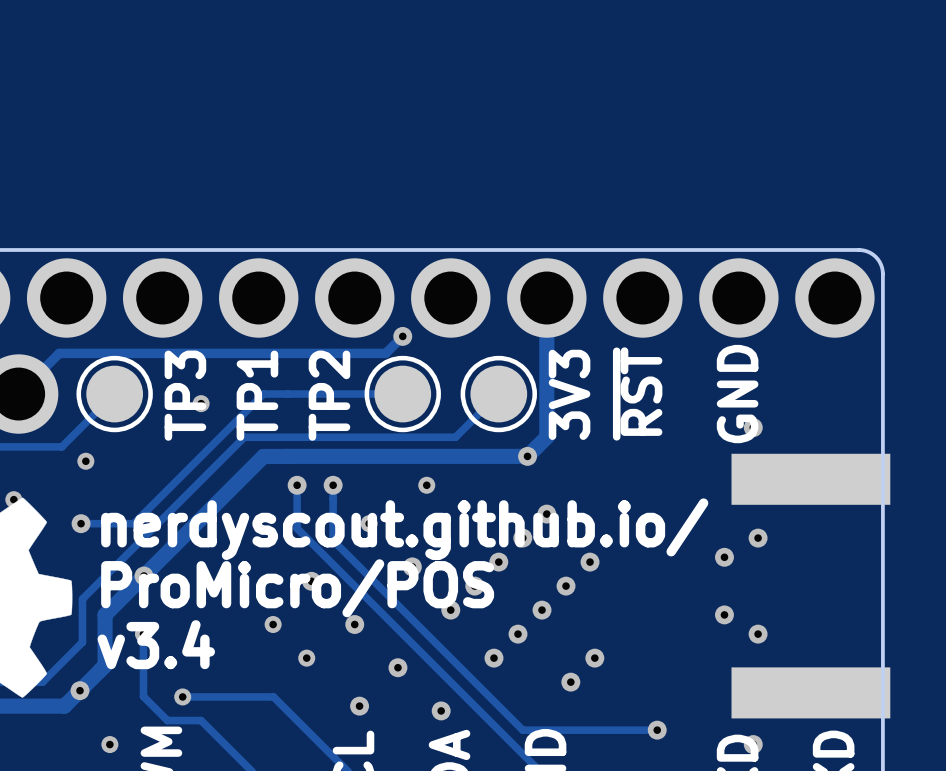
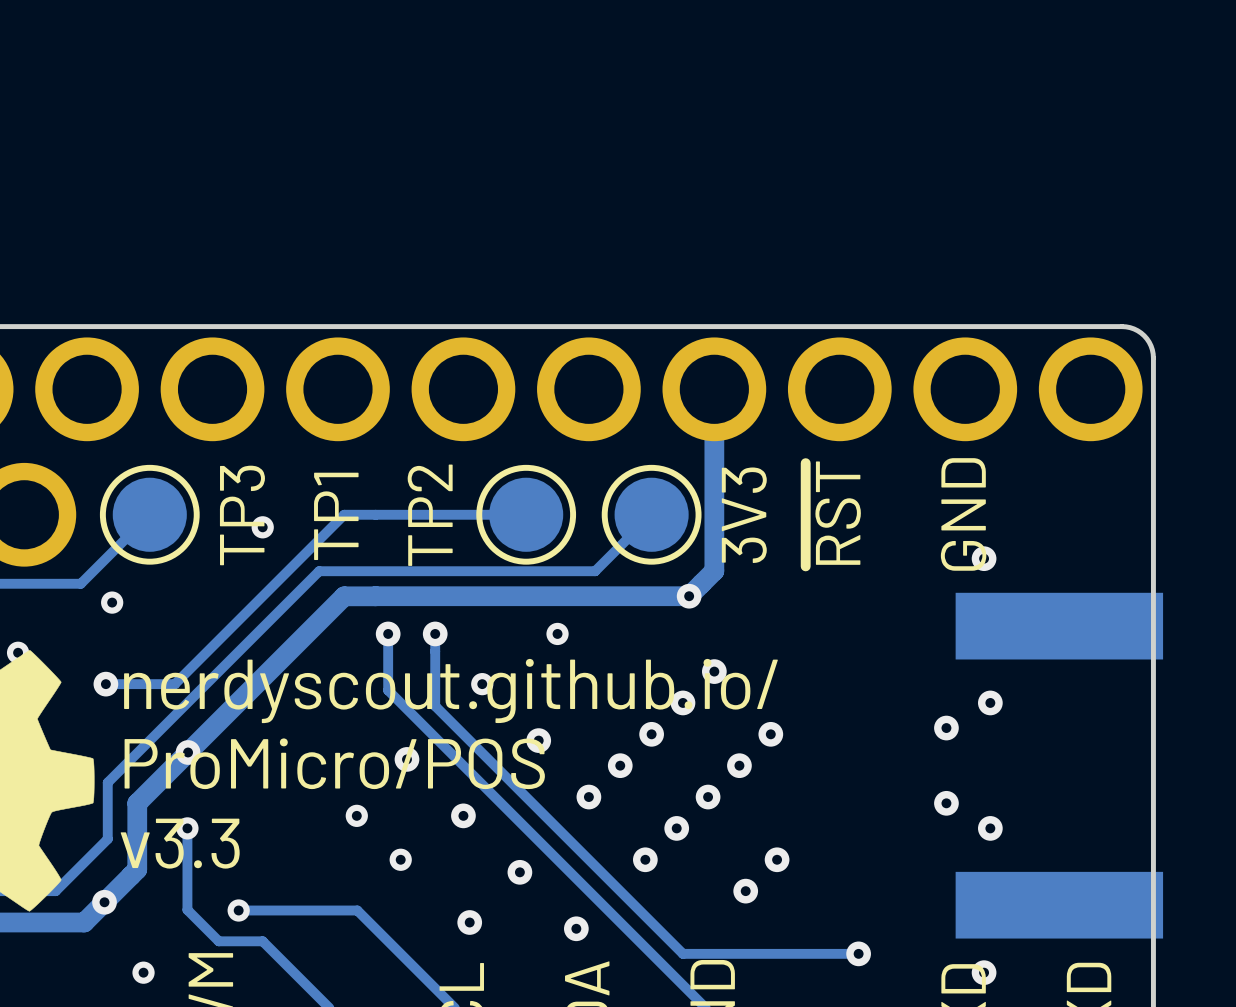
track: (402, 336) (385, 353) (59, 353) (18, 394) -> none
via: (402, 336) -> none
text: v3.4 (156, 644) -> v3.3 (180, 843)

